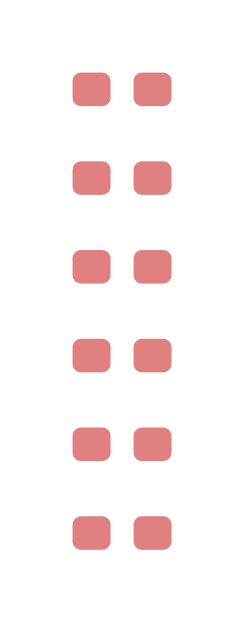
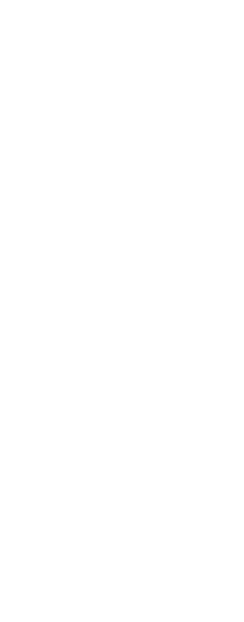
part: (122, 89) -> none
part: (122, 178) -> none
part: (122, 266) -> none
part: (122, 355) -> none
part: (122, 444) -> none
part: (122, 533) -> none

